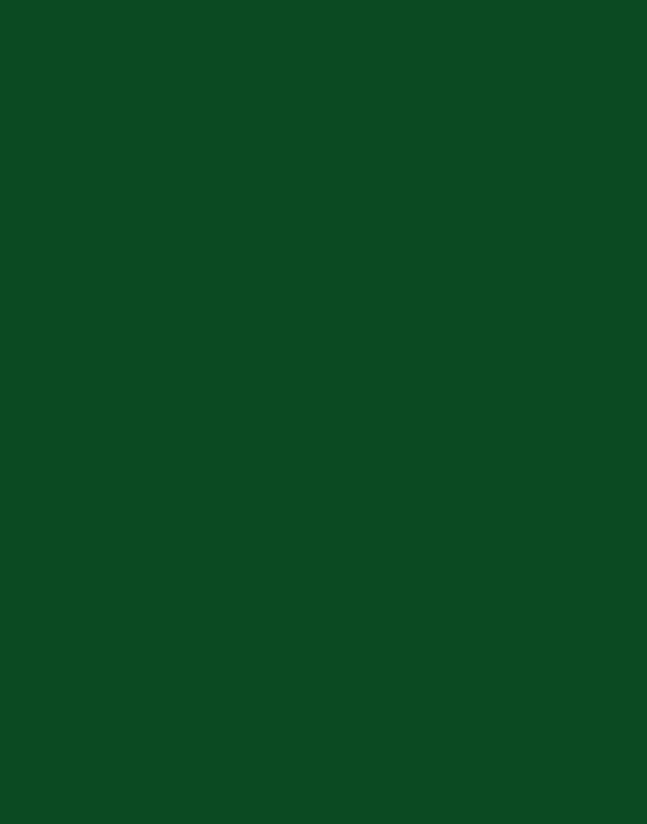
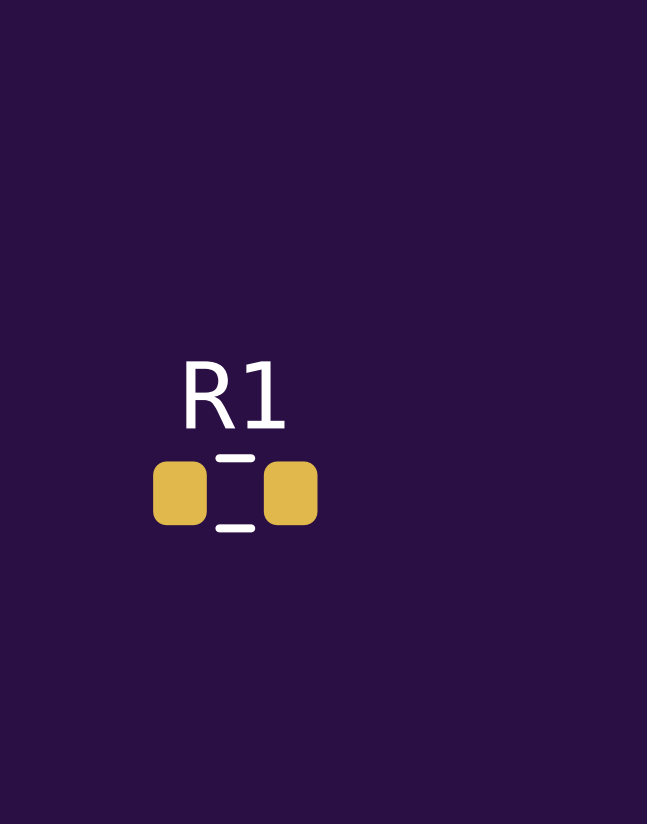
R1: none -> (235, 493)

